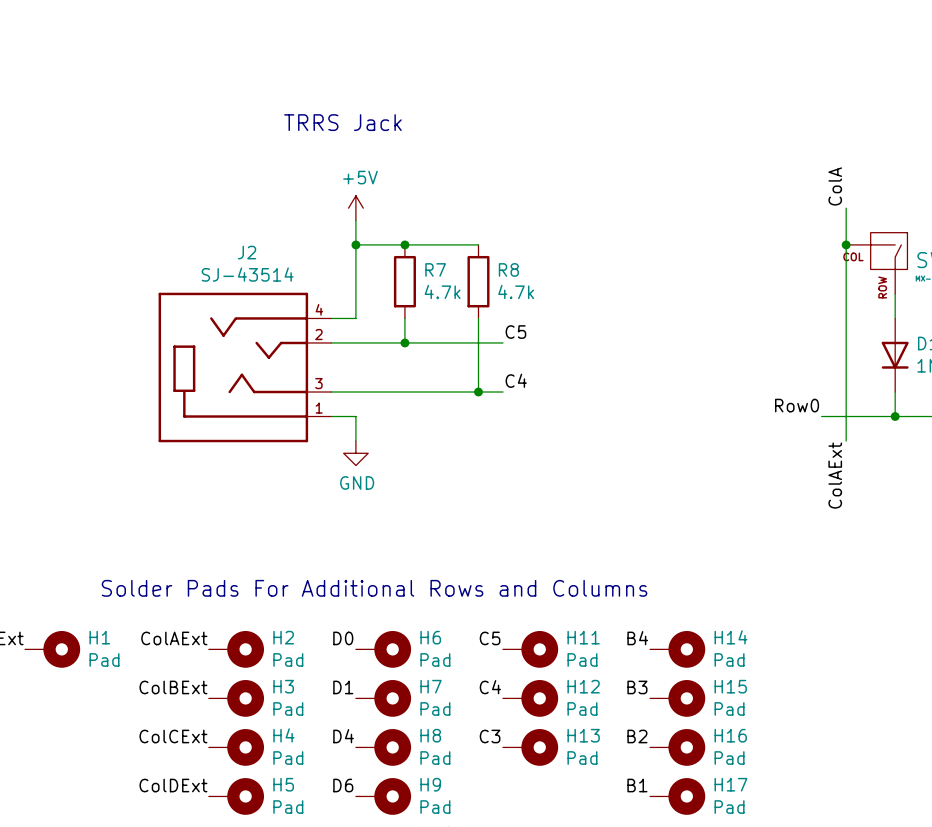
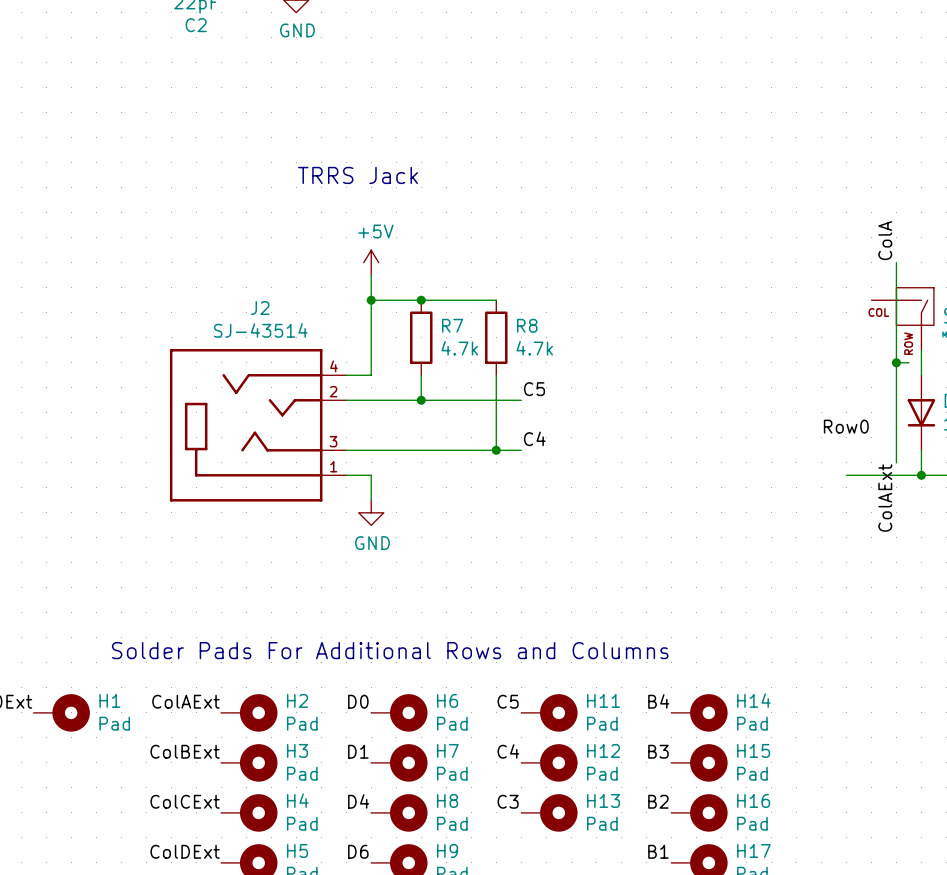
label position: ColA (835, 186) -> ColA (885, 240)
wire: (846, 208) (846, 441) -> none
wire: none -> (896, 262) (896, 462)
junction: (846, 244) -> none
wire: none -> (896, 362) (908, 362)
junction: none -> (896, 362)
label position: Row0 (797, 405) -> Row0 (846, 426)
label position: ColAExt (835, 475) -> ColAExt (885, 498)

